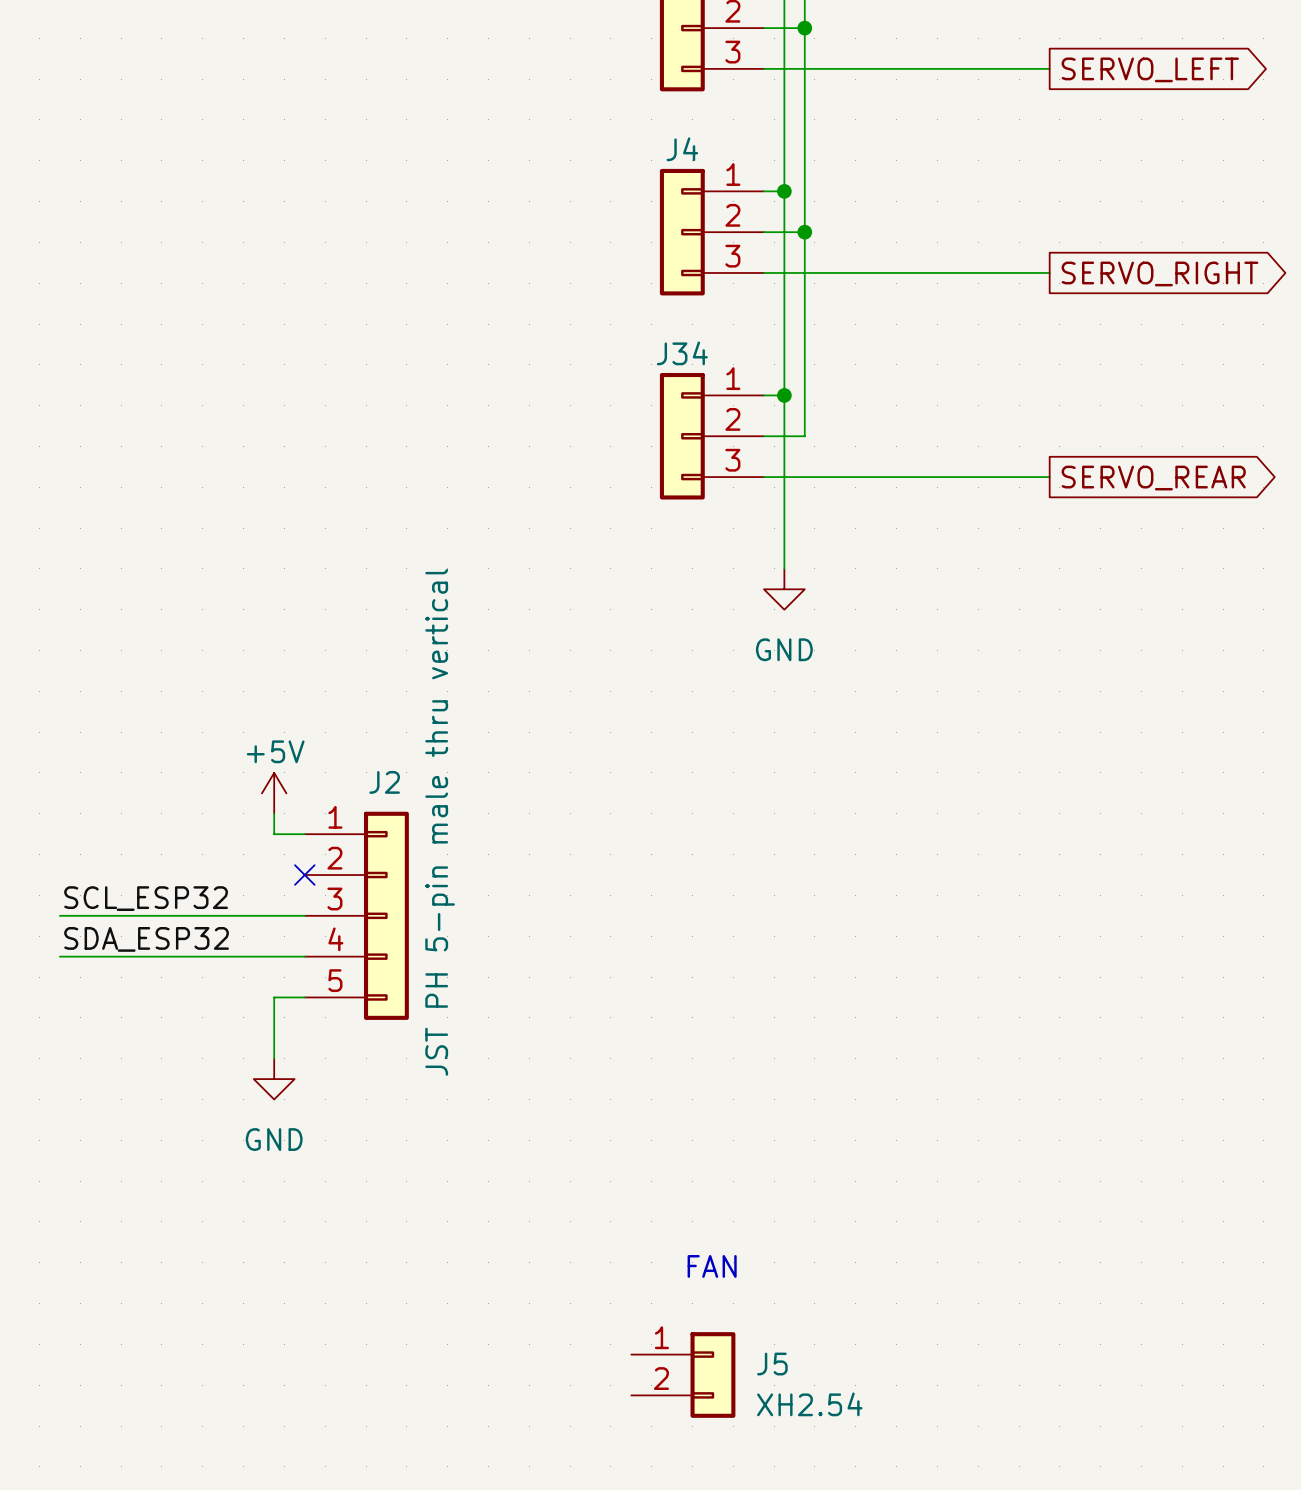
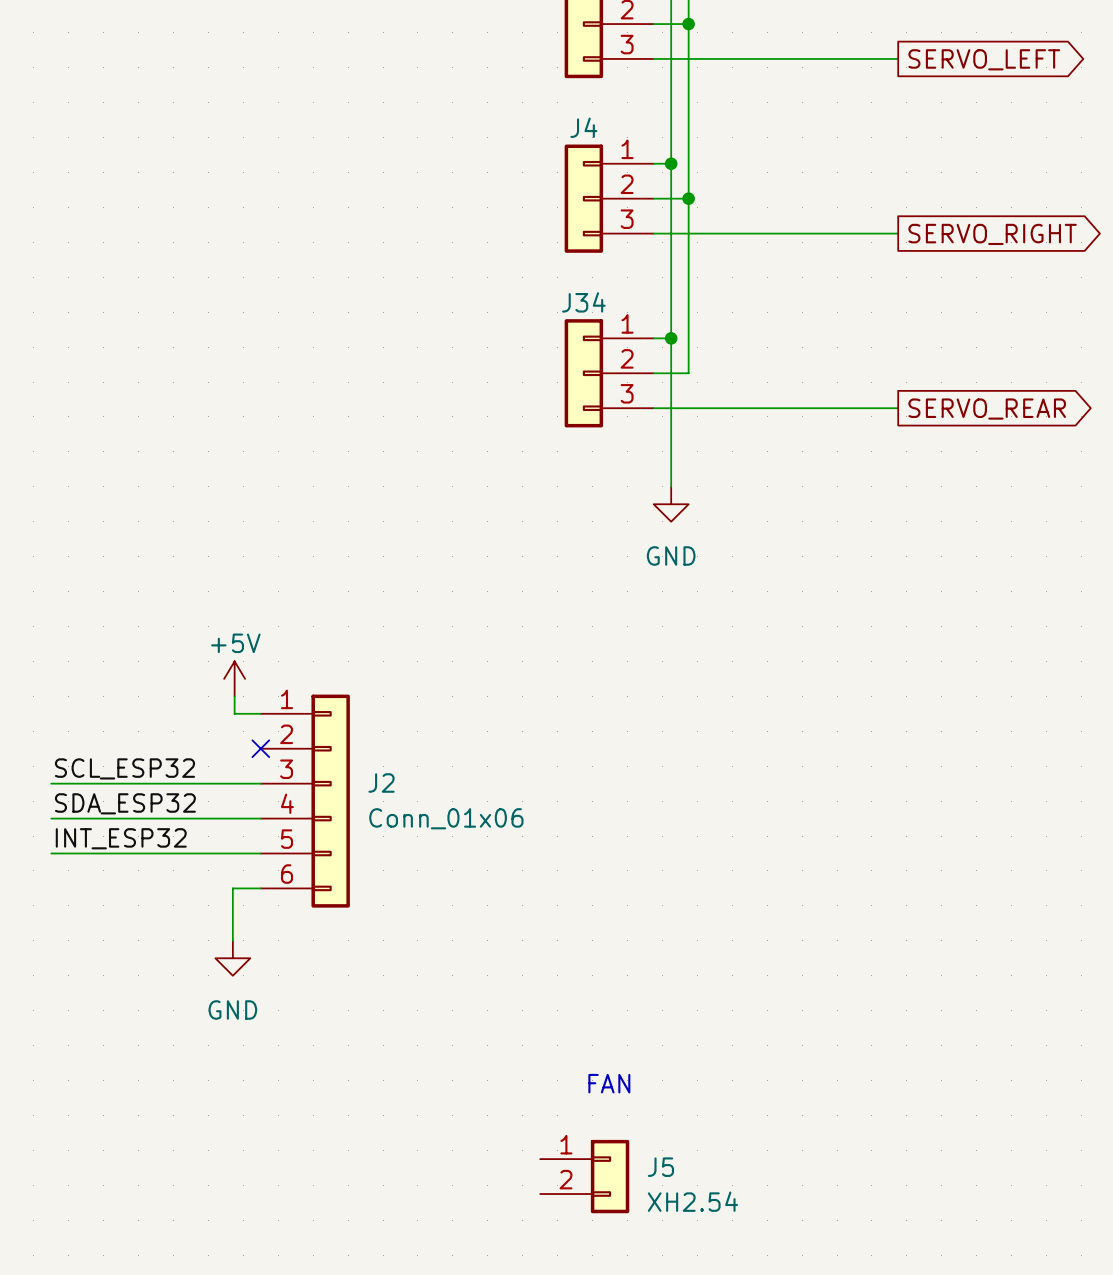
J2 name position: J2 (384, 782) -> J2 (381, 783)
J2 symbol: [304, 811, 409, 1020] -> [260, 694, 350, 908]
J2 value: JST PH 5-pin male thru vertical (440, 822) -> Conn_01x06 (446, 818)
label: none -> INT_ESP32 (121, 838)
wire: (274, 997) (274, 1058) -> (234, 853) (51, 853)
wire: none -> (260, 888) (232, 888) (232, 940)
power symbol position: GND (274, 1079) -> GND (232, 958)

